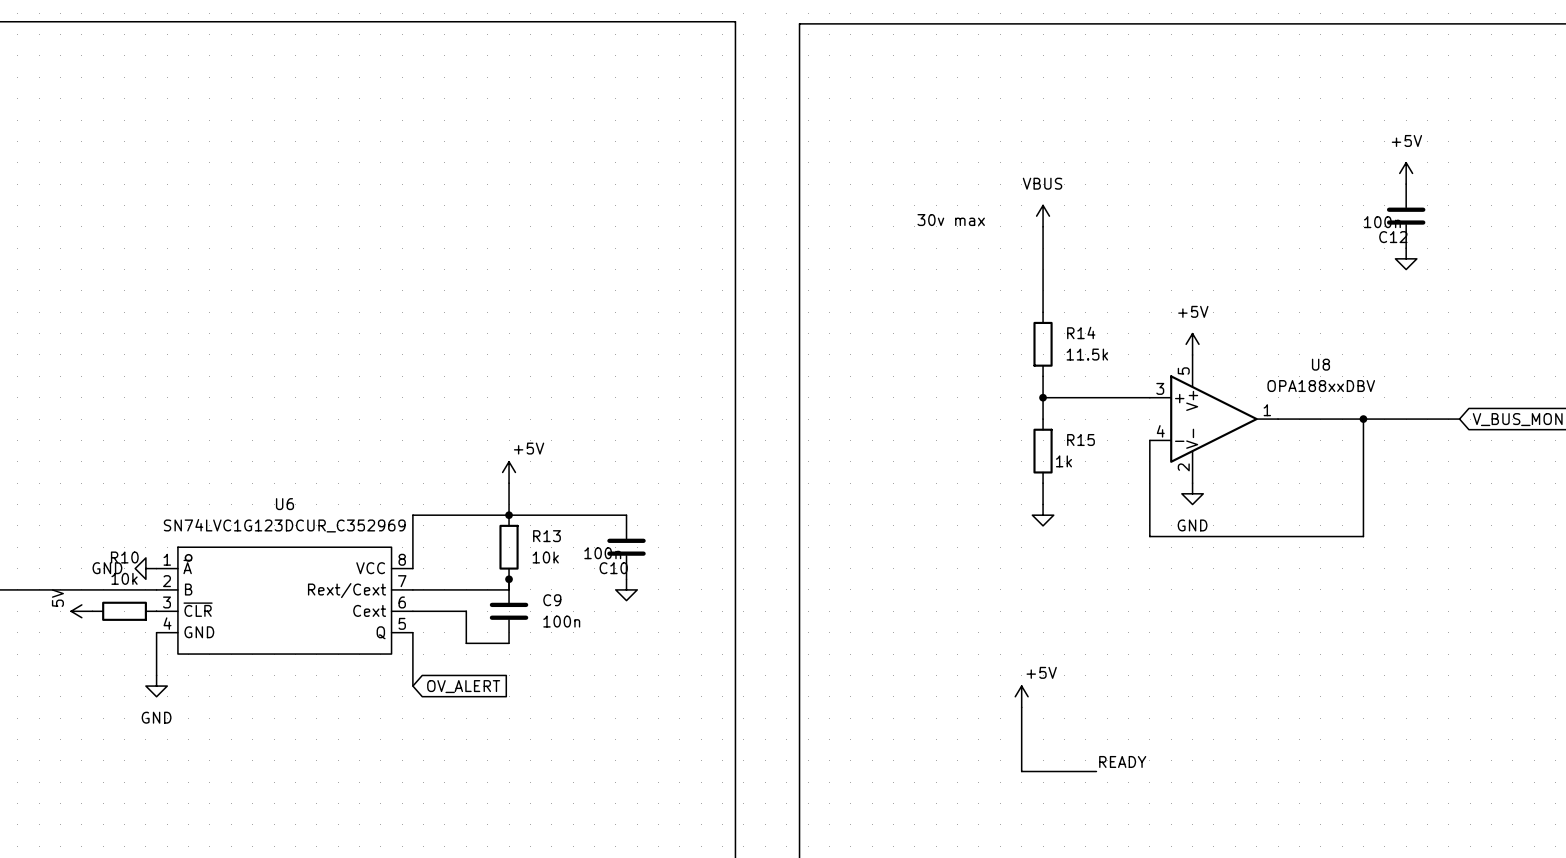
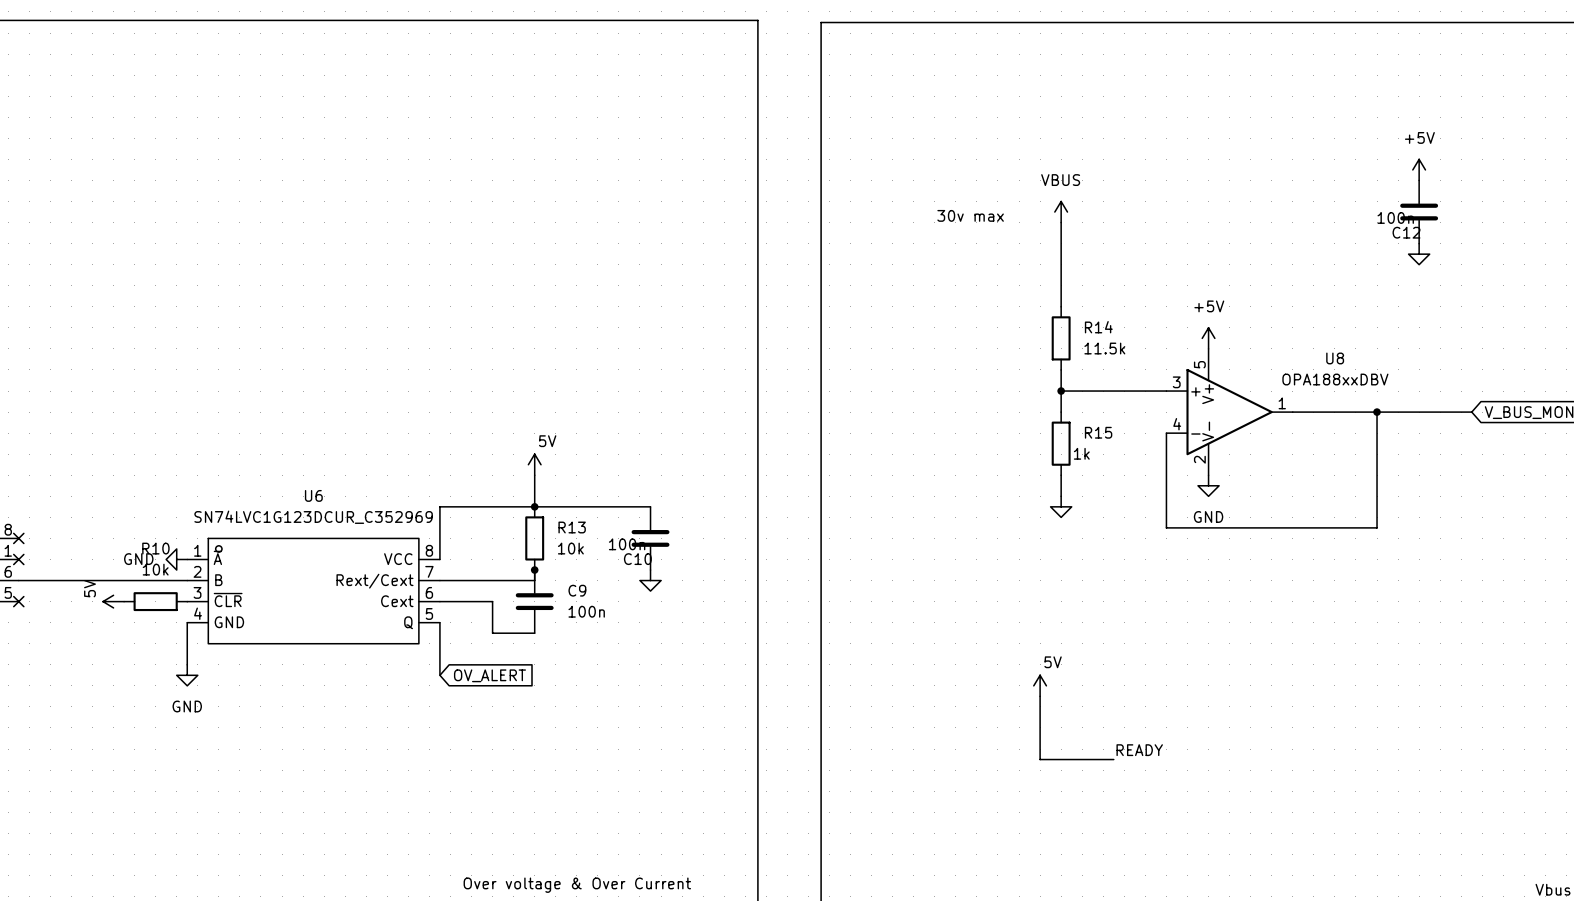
power symbol: +5V (509, 472) -> 5V (534, 464)
power symbol: +5V (1021, 696) -> 5V (1040, 685)

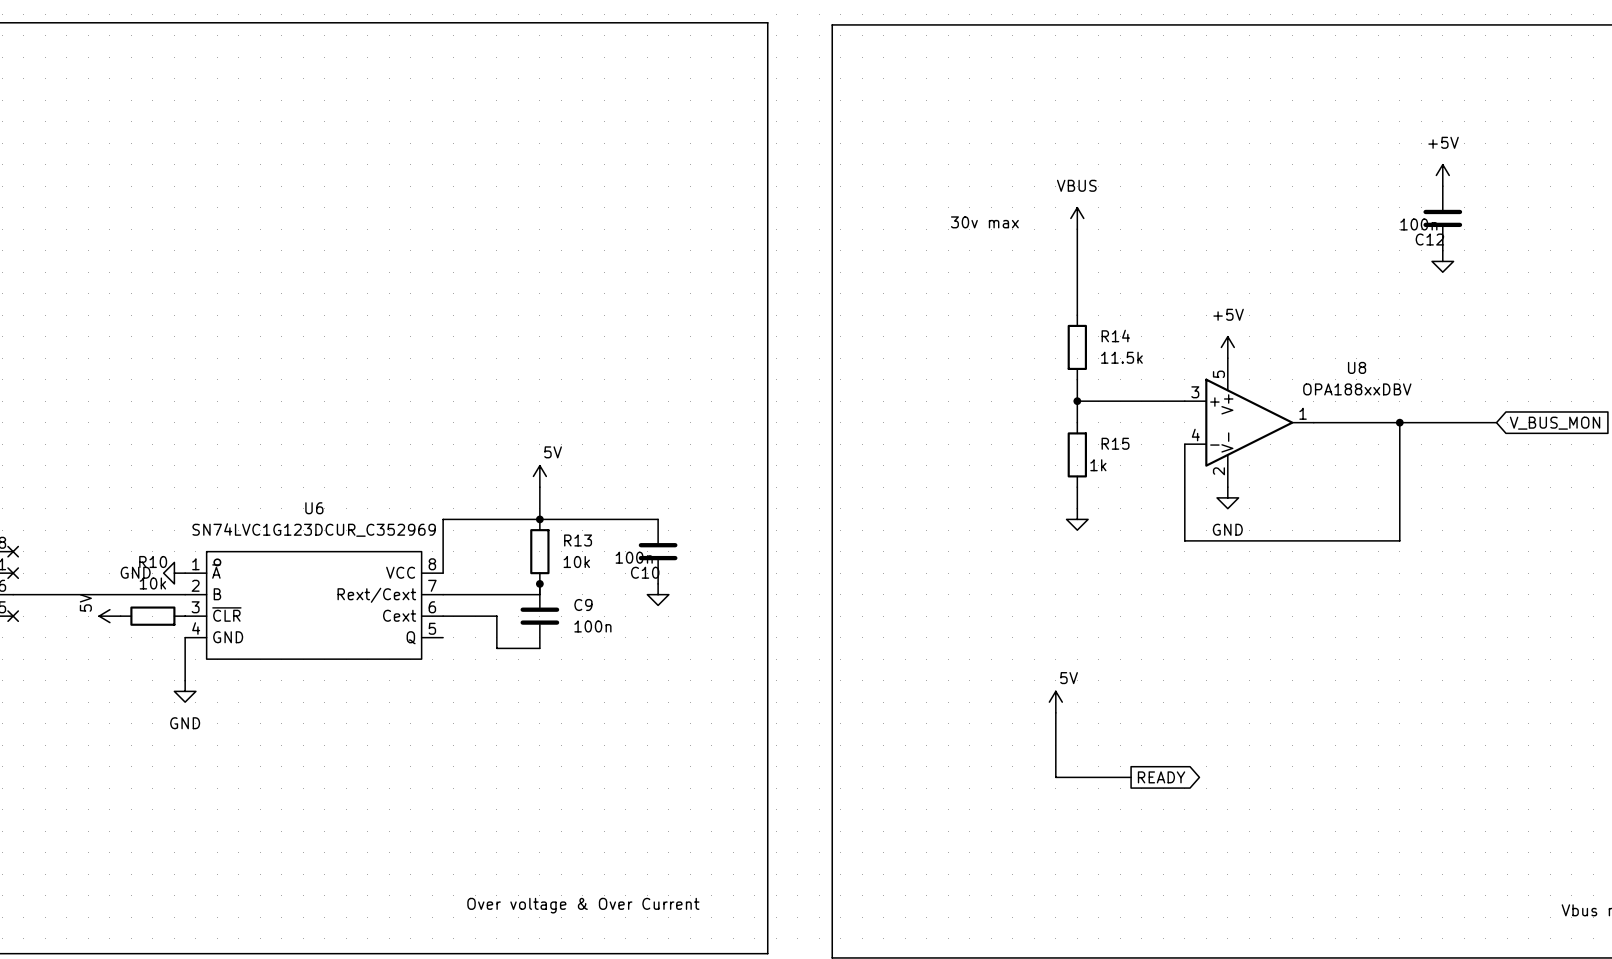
wire: (439, 622) (439, 675) -> none
global label: OV_ALERT (489, 675) -> none
label: READY (1139, 750) -> none
global label: none -> READY (1161, 777)

